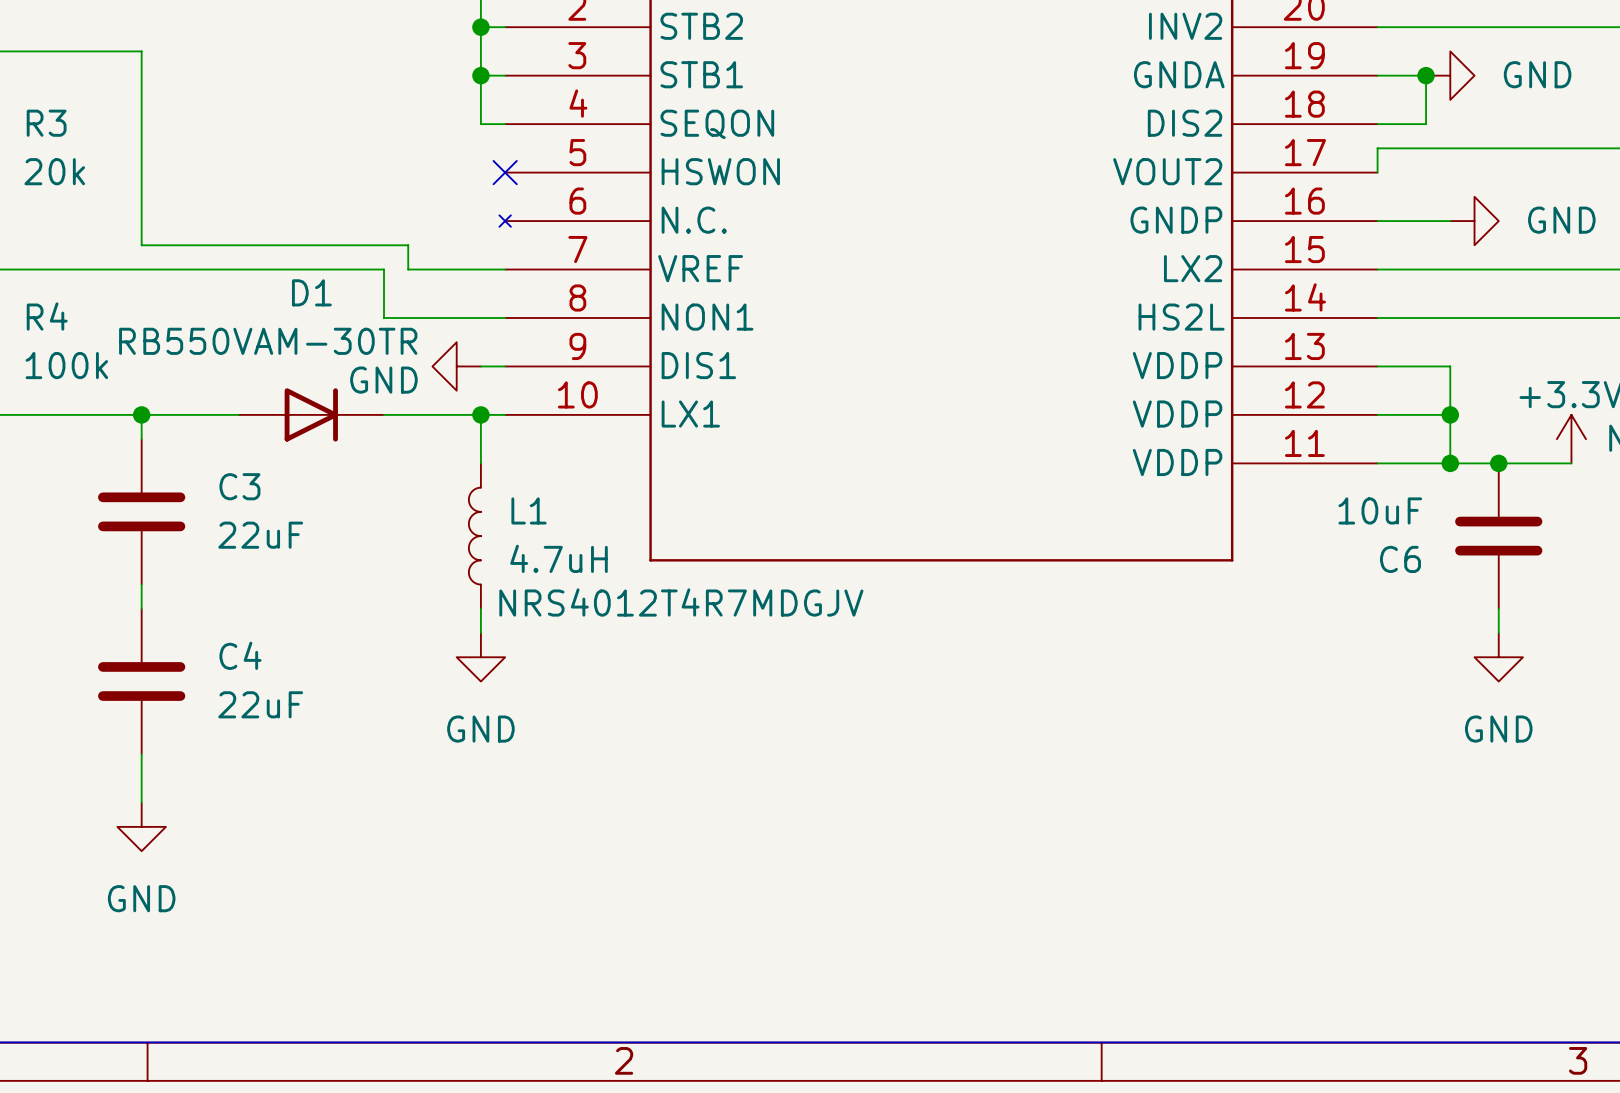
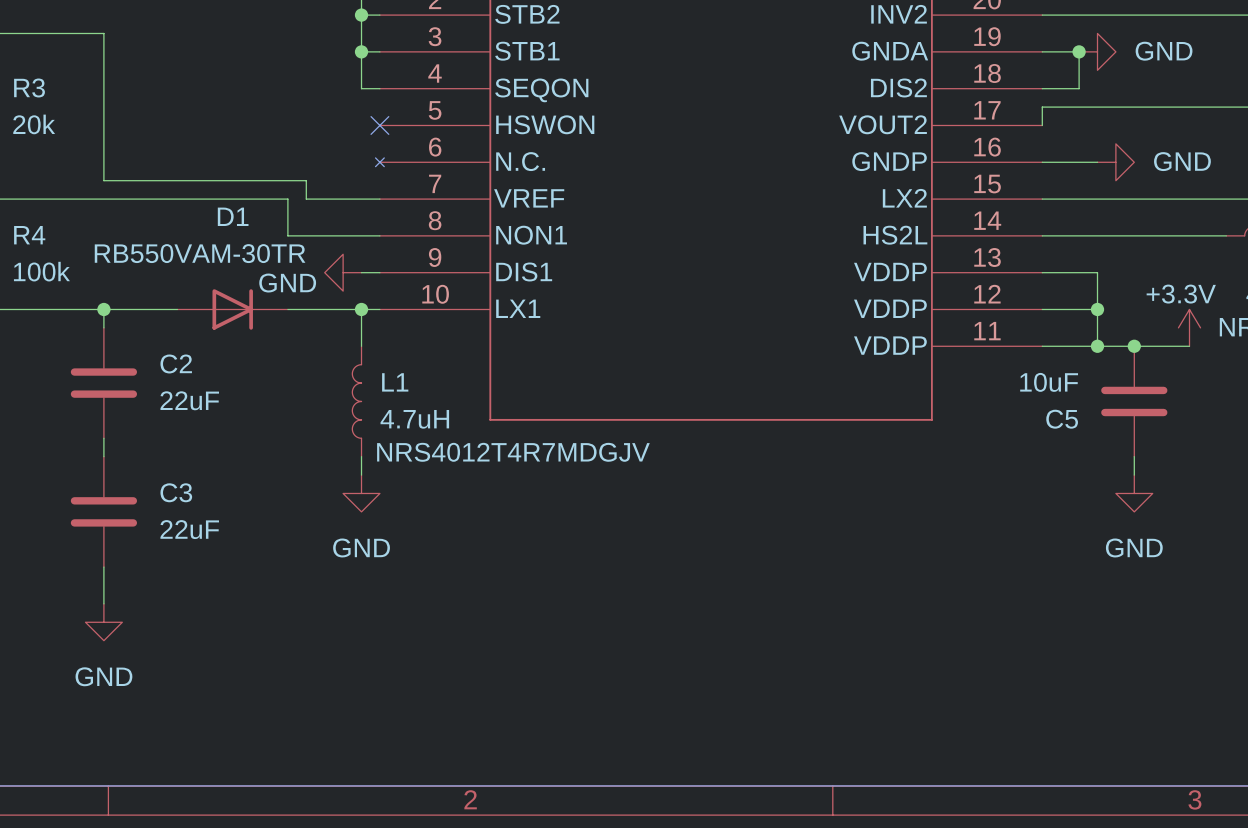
C3 name: C3 (239, 486) -> C2 (176, 363)
C6 name: C6 (1400, 559) -> C5 (1062, 419)
C4 name: C4 (240, 655) -> C3 (176, 492)

